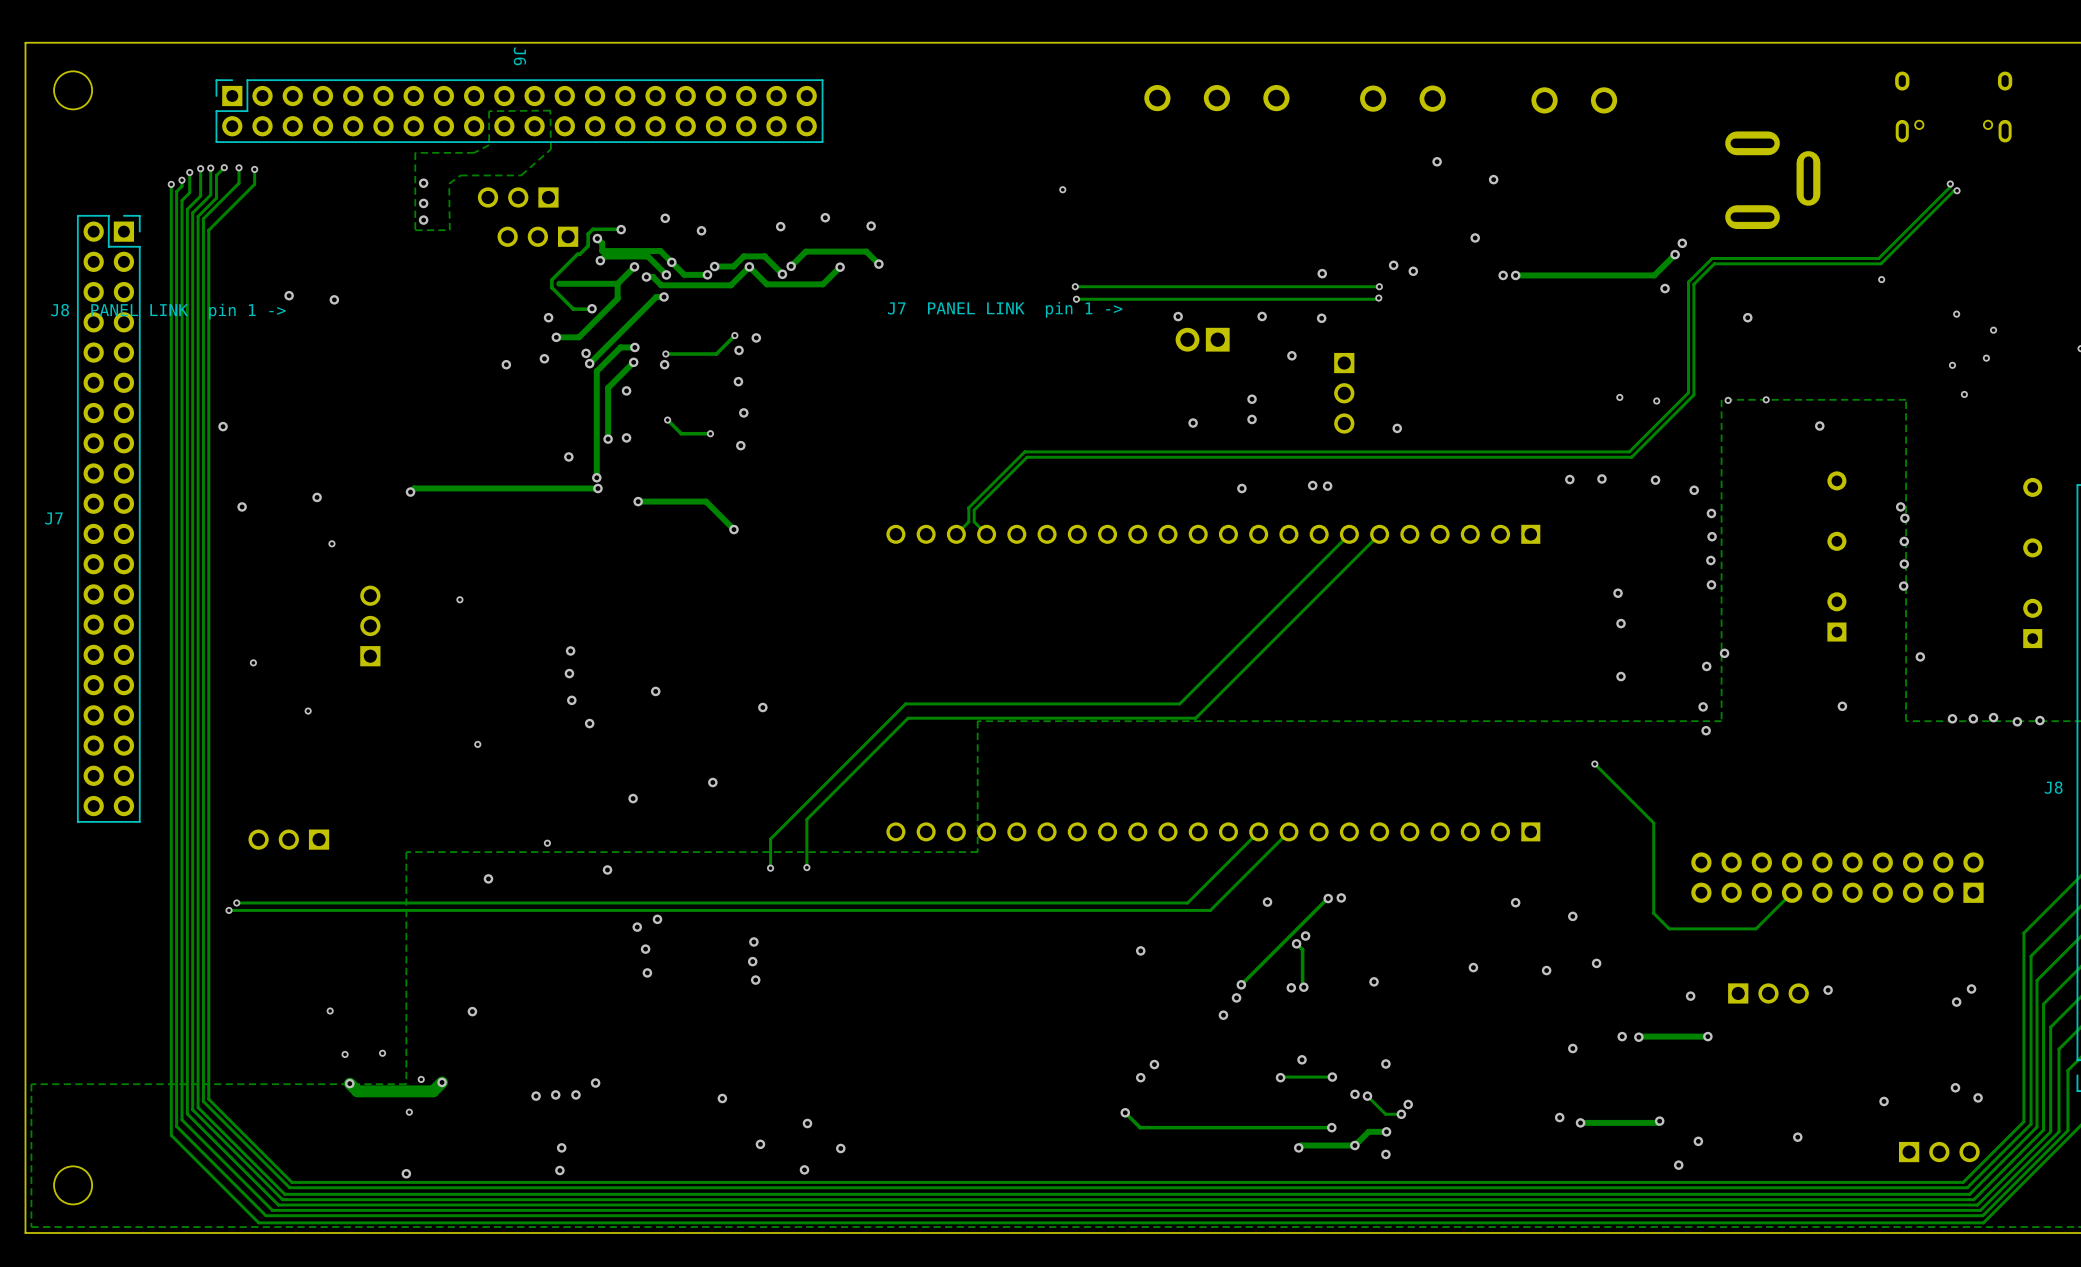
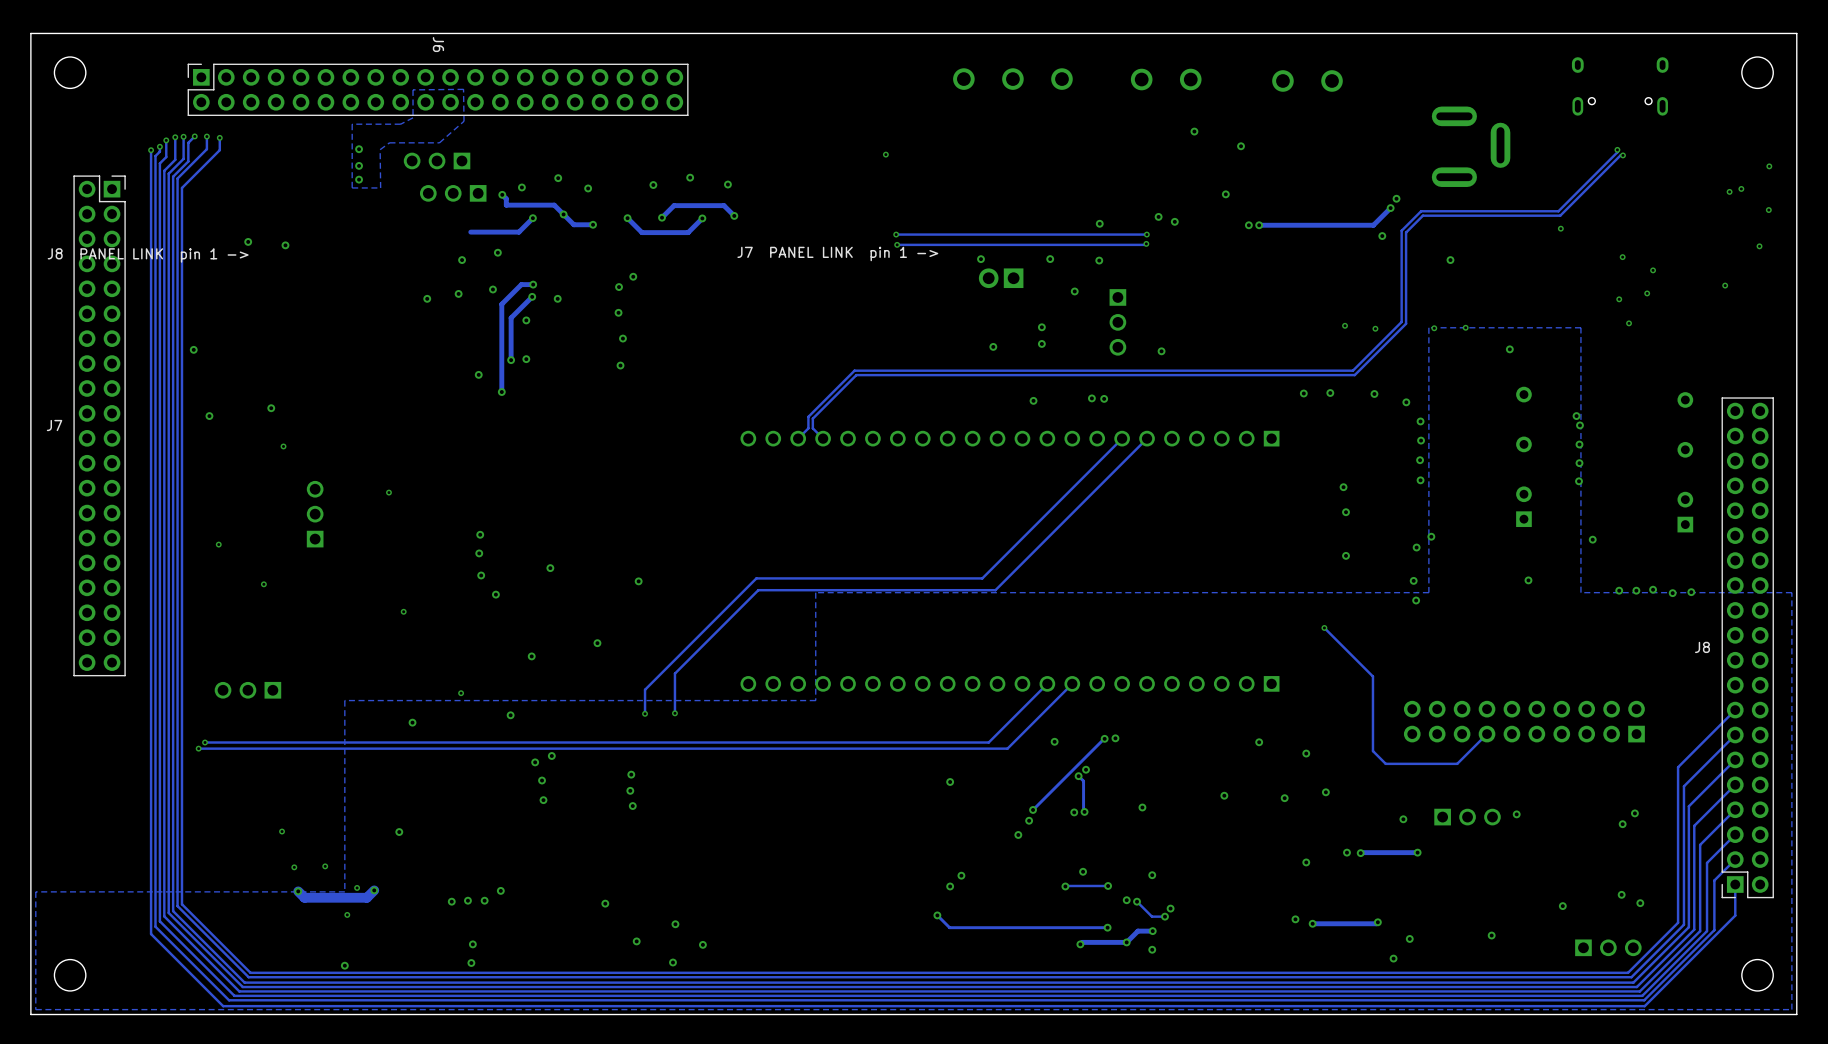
track: (620, 229) (592, 229) (588, 234) (588, 245) (551, 279) (551, 287) (573, 309) (591, 309) -> none
track: (600, 260) (604, 256) (647, 256) (666, 274) -> none
via: (600, 260) -> none
track: (714, 266) (733, 266) (743, 256) (764, 256) (782, 274) -> none
via: (714, 266) -> none
track: (749, 266) (730, 285) (661, 285) (652, 276) (646, 276) -> none
via: (666, 274) -> none
via: (782, 274) -> none
via: (646, 276) -> none
track: (617, 283) (617, 298) (578, 337) (556, 337) -> none
track: (664, 296) (656, 296) (589, 363) -> none
via: (664, 296) -> none
track: (734, 335) (716, 353) (665, 353) -> none
via: (734, 335) -> none
via: (556, 337) -> none
via: (665, 353) -> none
via: (589, 363) -> none
track: (667, 420) (681, 433) (710, 433) -> none
via: (667, 420) -> none
via: (710, 433) -> none
track: (597, 488) (414, 488) (410, 492) -> none
via: (597, 488) -> none
via: (410, 492) -> none
track: (638, 501) (706, 501) (733, 529) -> none
via: (638, 501) -> none
via: (733, 529) -> none

